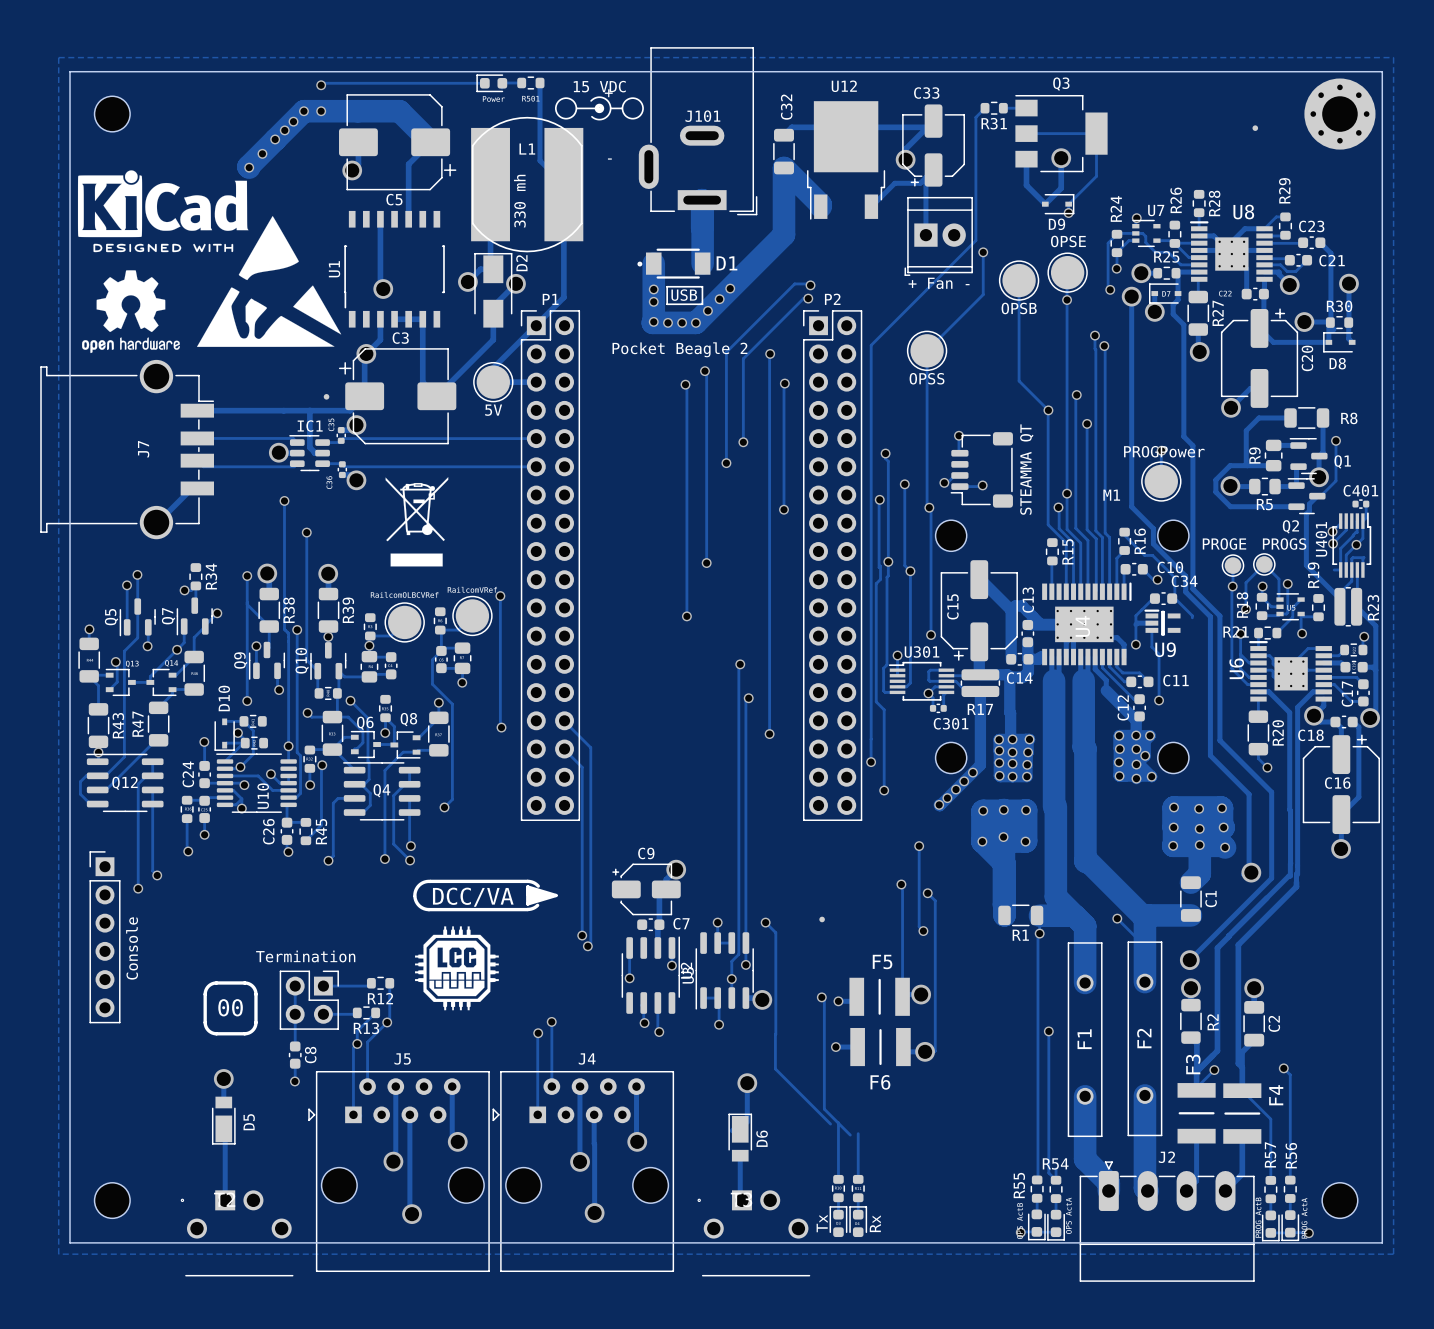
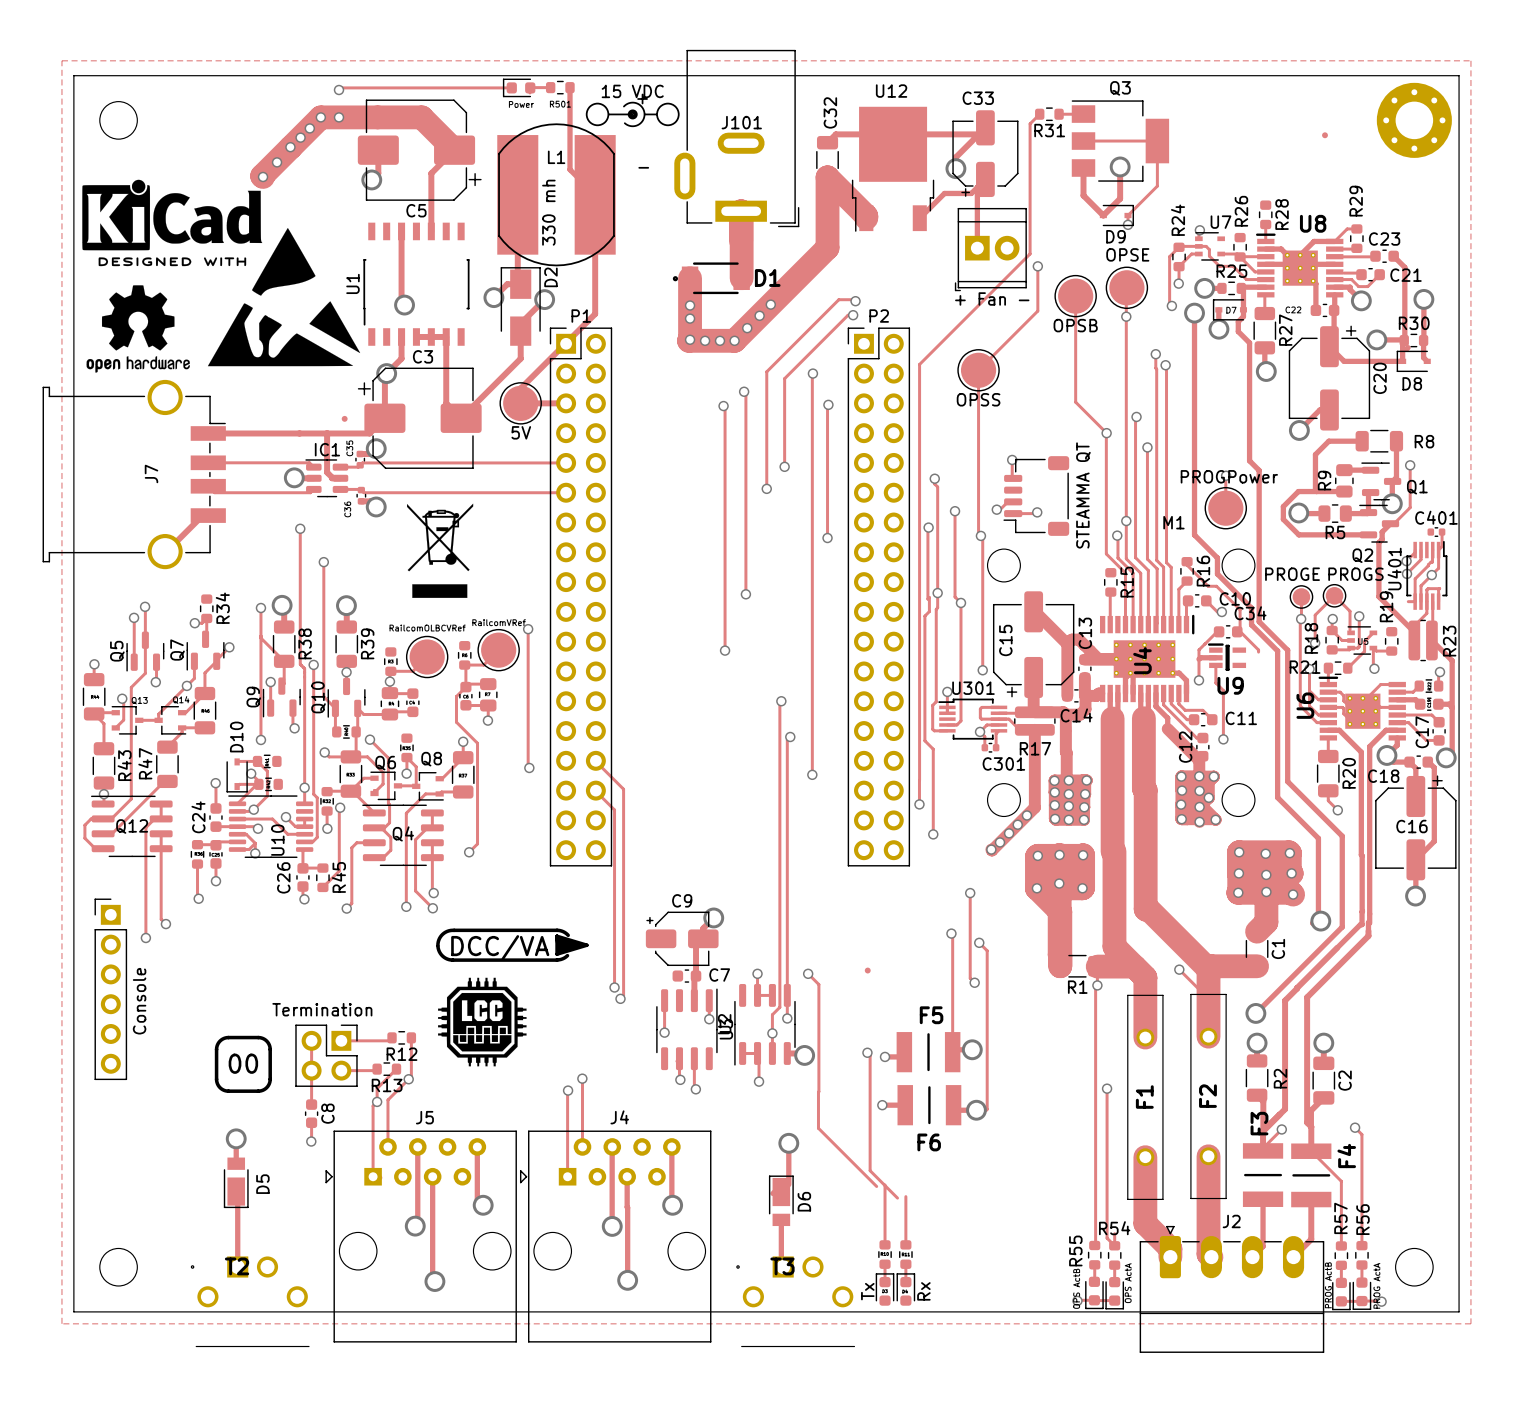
line: (667, 286) (702, 286) (702, 304) (667, 304) (667, 286) -> none
text: USB (684, 295) -> none
text: Pocket Beagle 2 (679, 349) -> none

